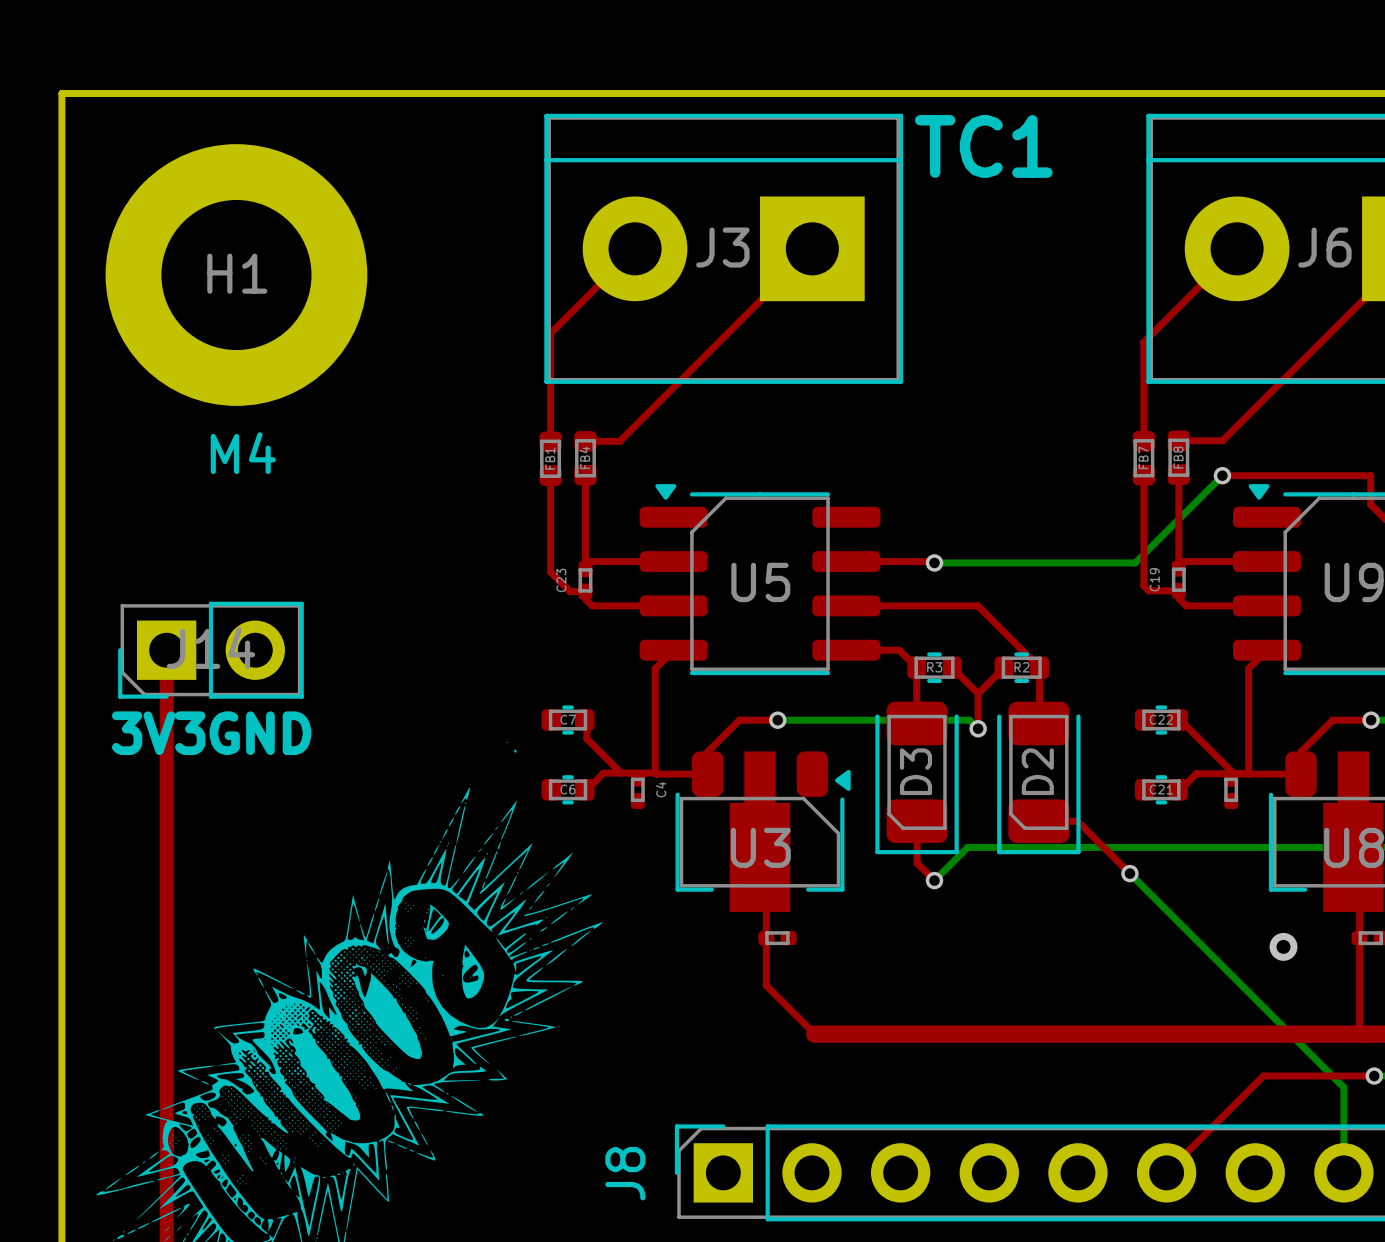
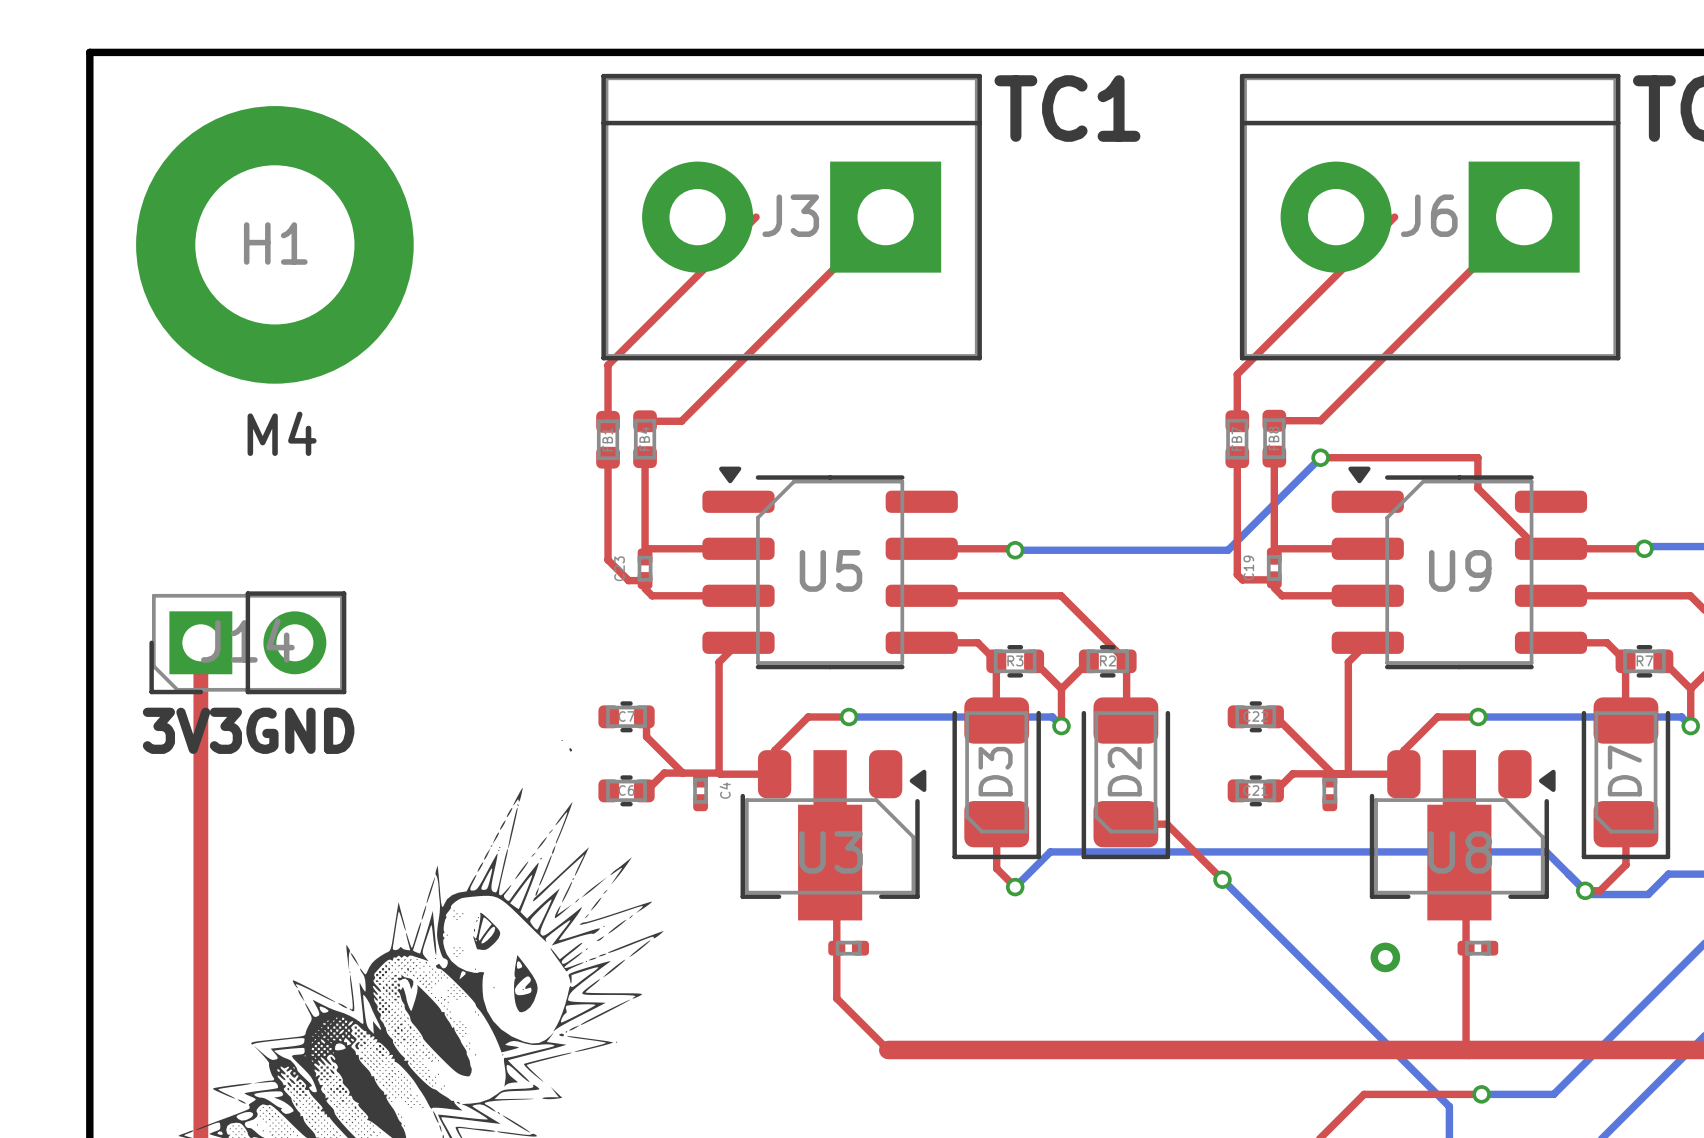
top track: (635, 248) (550, 333) (550, 388) -> (756, 217) (608, 365)
top track: (1237, 248) (1143, 342) (1143, 397) -> (1394, 217) (1237, 374)

